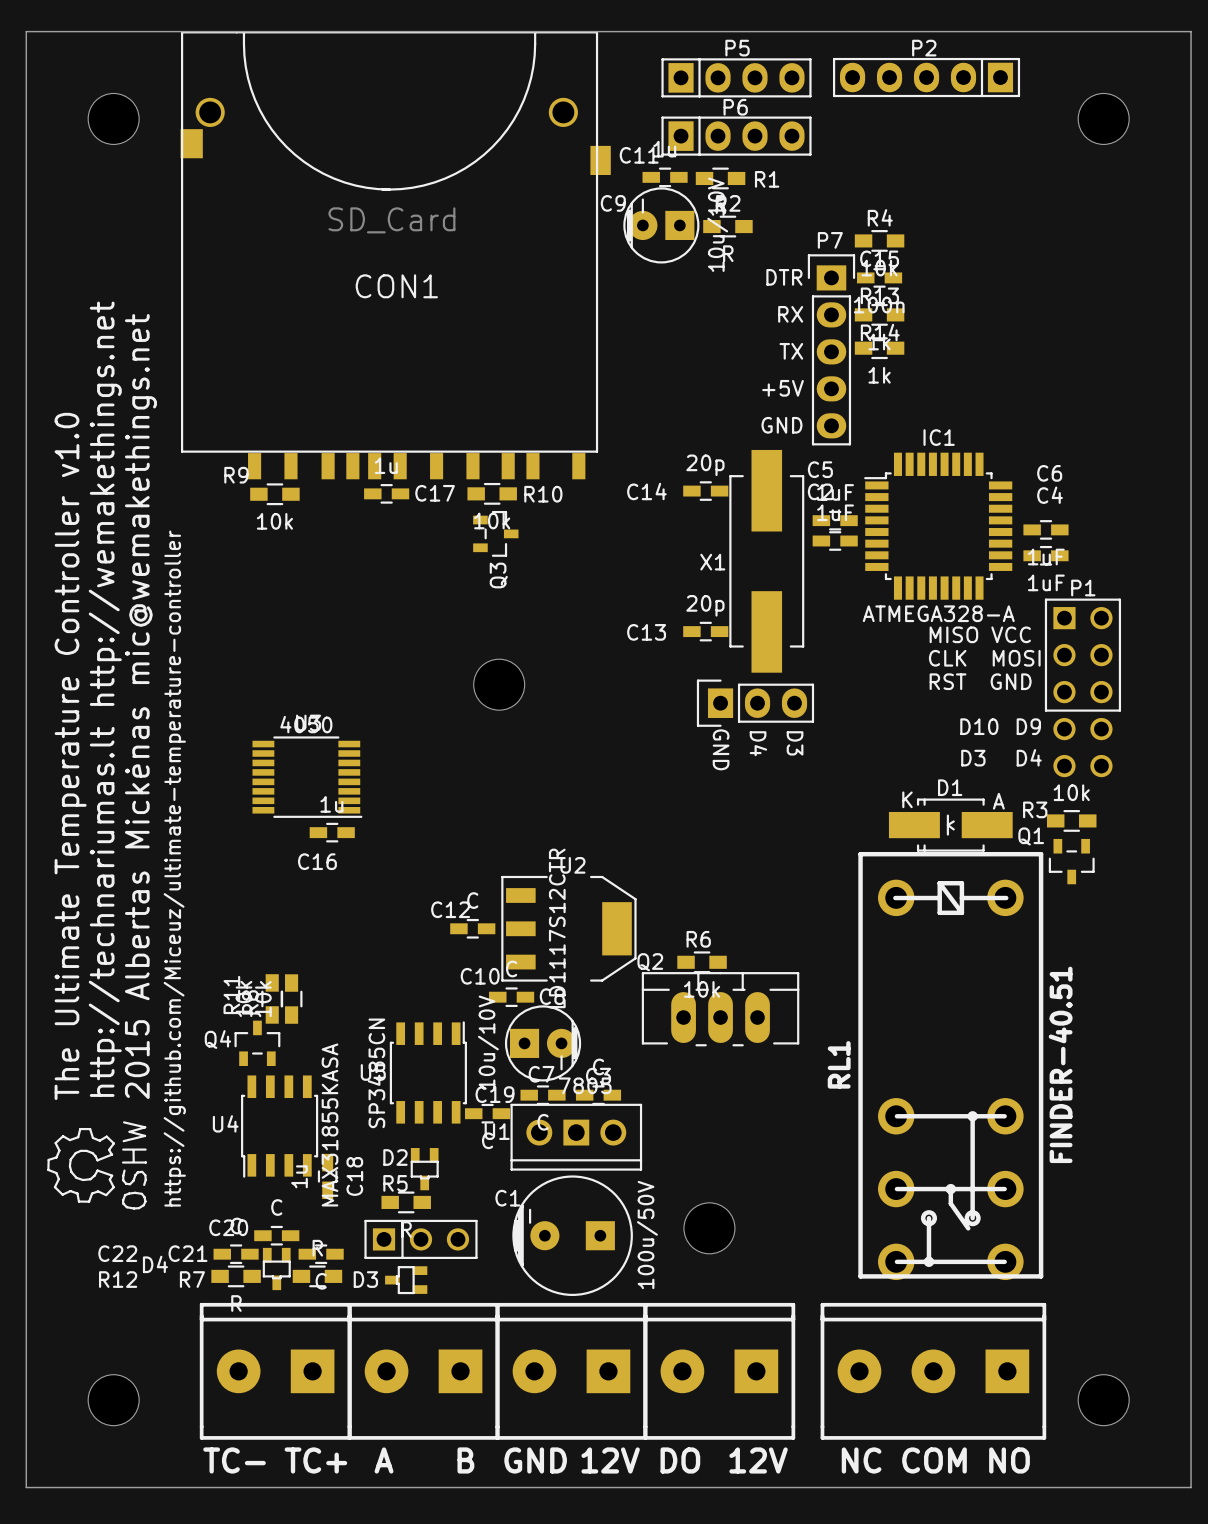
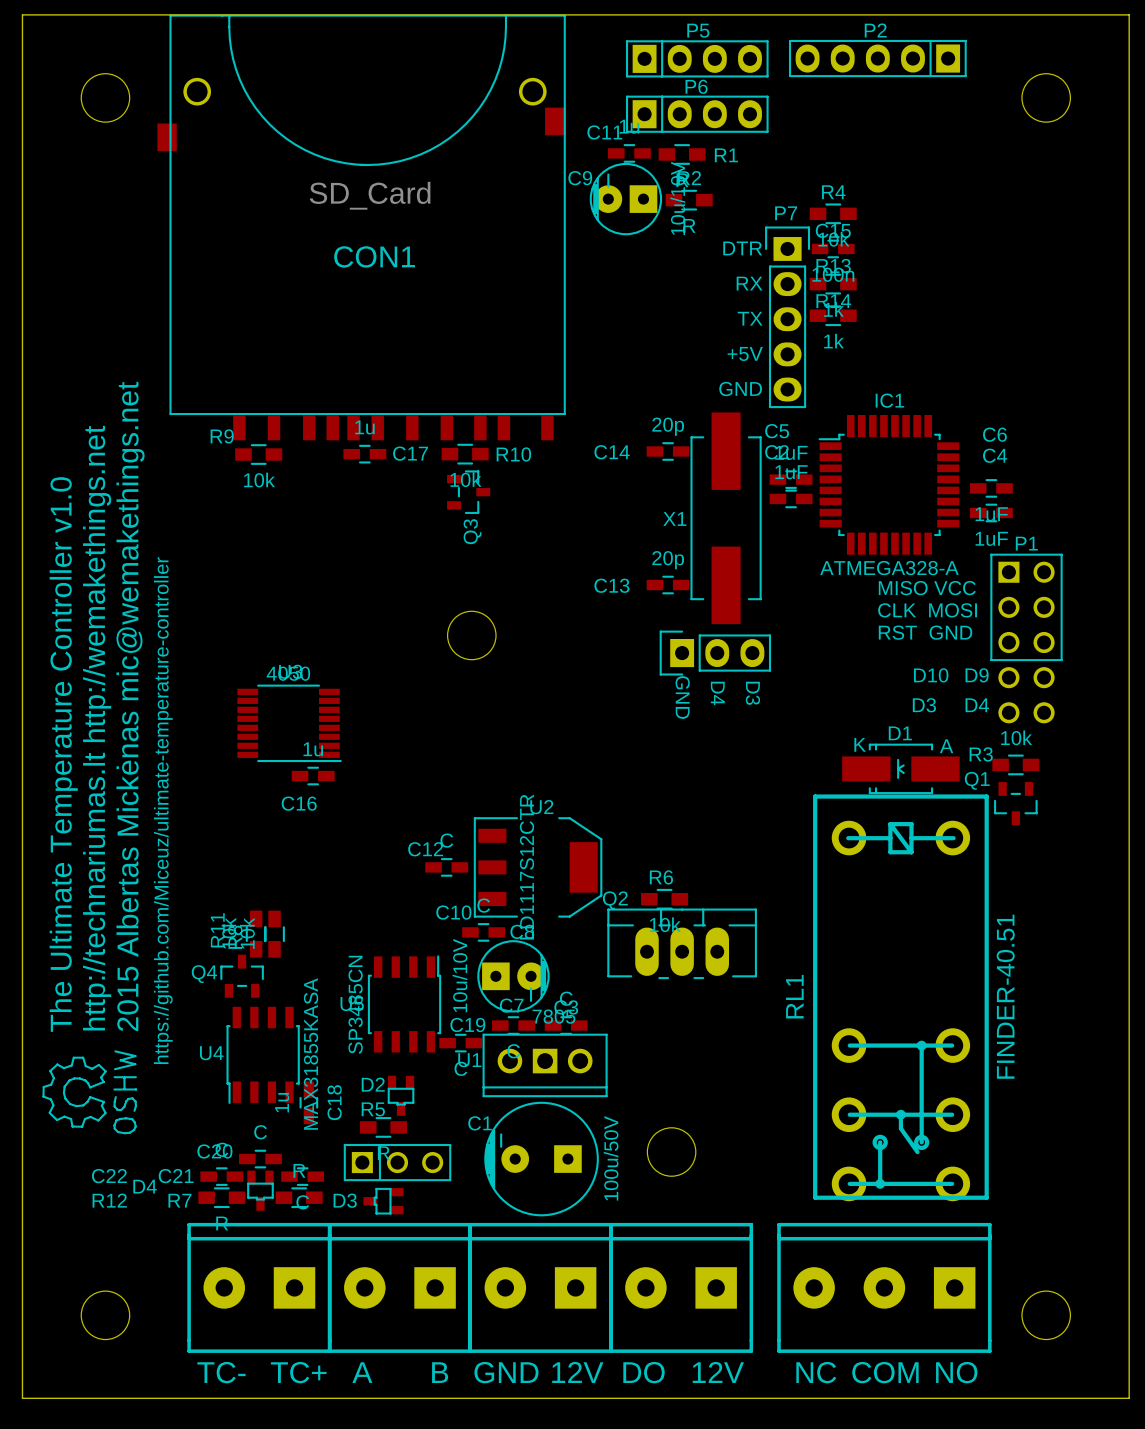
CON1 footprint: [180, 31, 611, 480] -> [157, 14, 567, 441]

